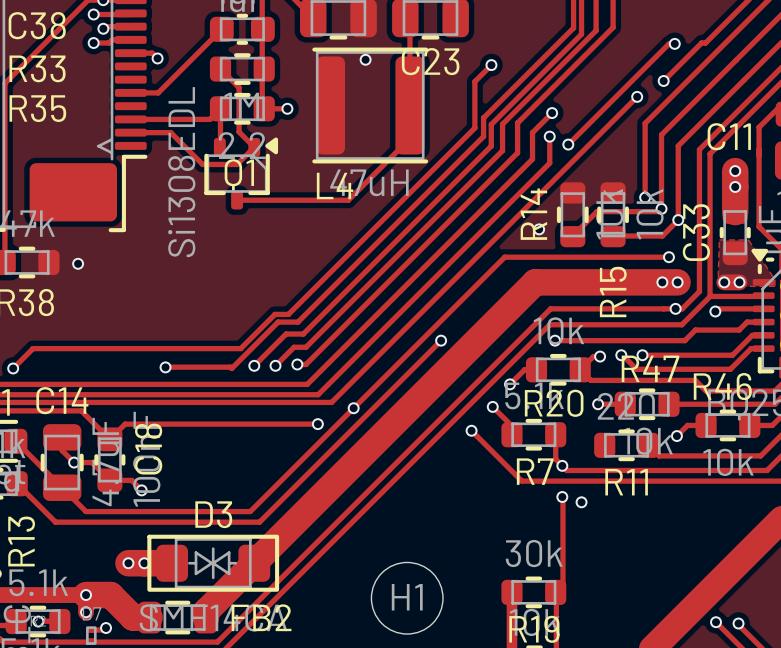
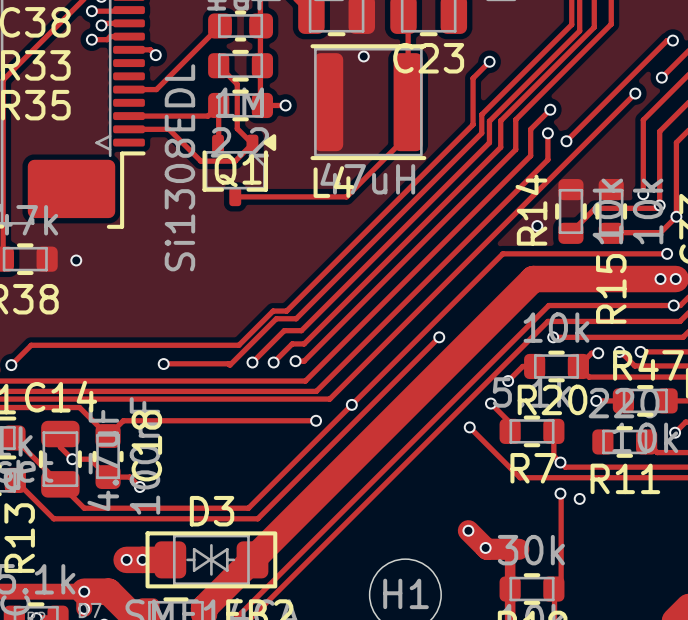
track: none -> (468, 530) (486, 549) (518, 549) (510, 557) (510, 589)
via: none -> (468, 530)
via: none -> (485, 547)

